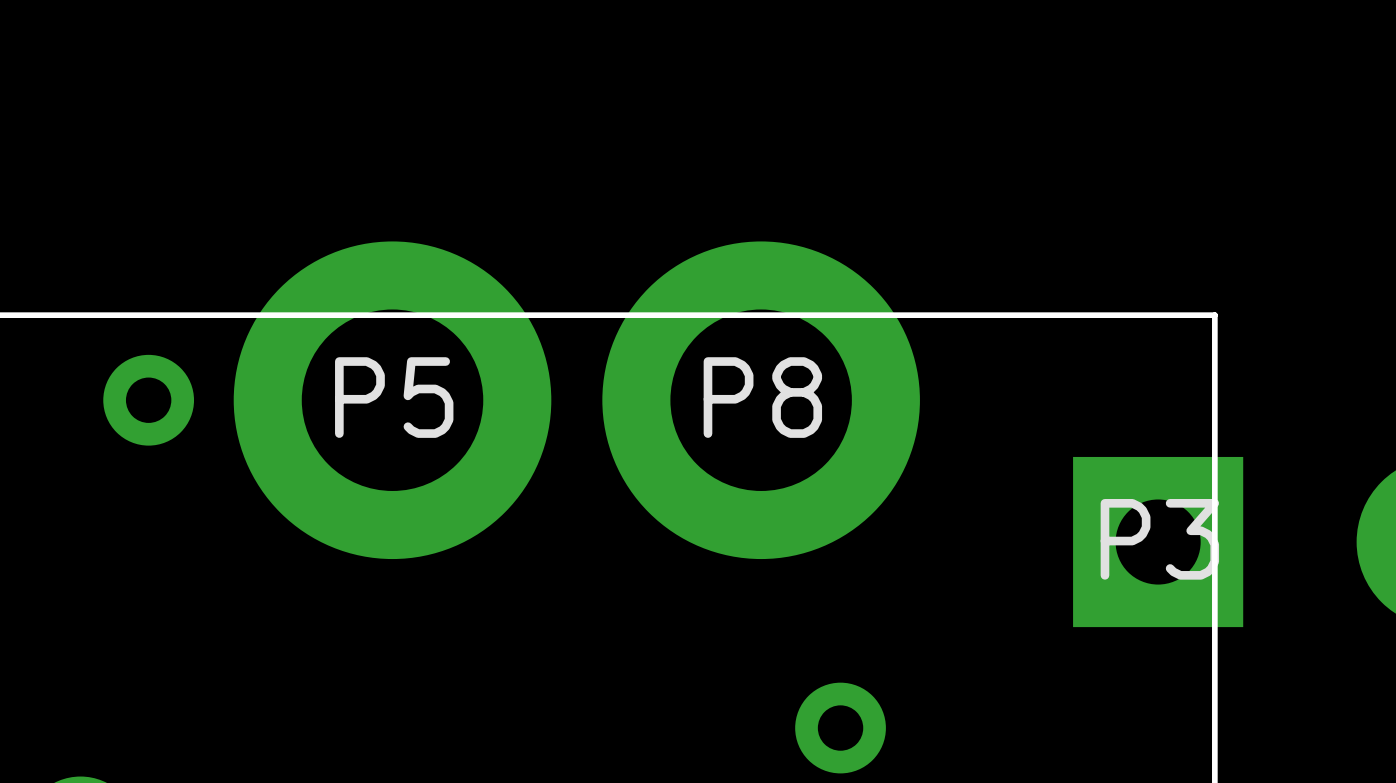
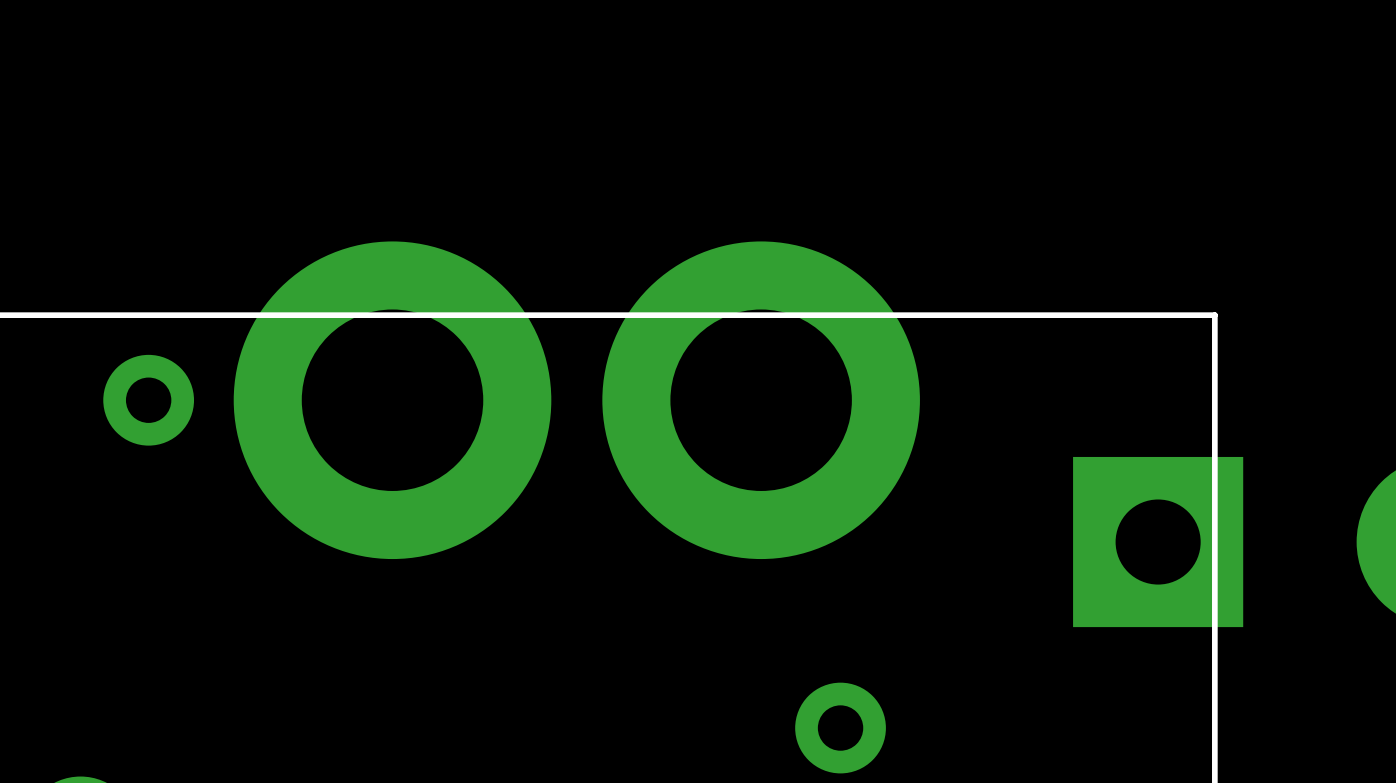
P5 name: P5 (394, 397) -> none
P8 name: P8 (762, 397) -> none
P3 name: P3 (1159, 539) -> none

